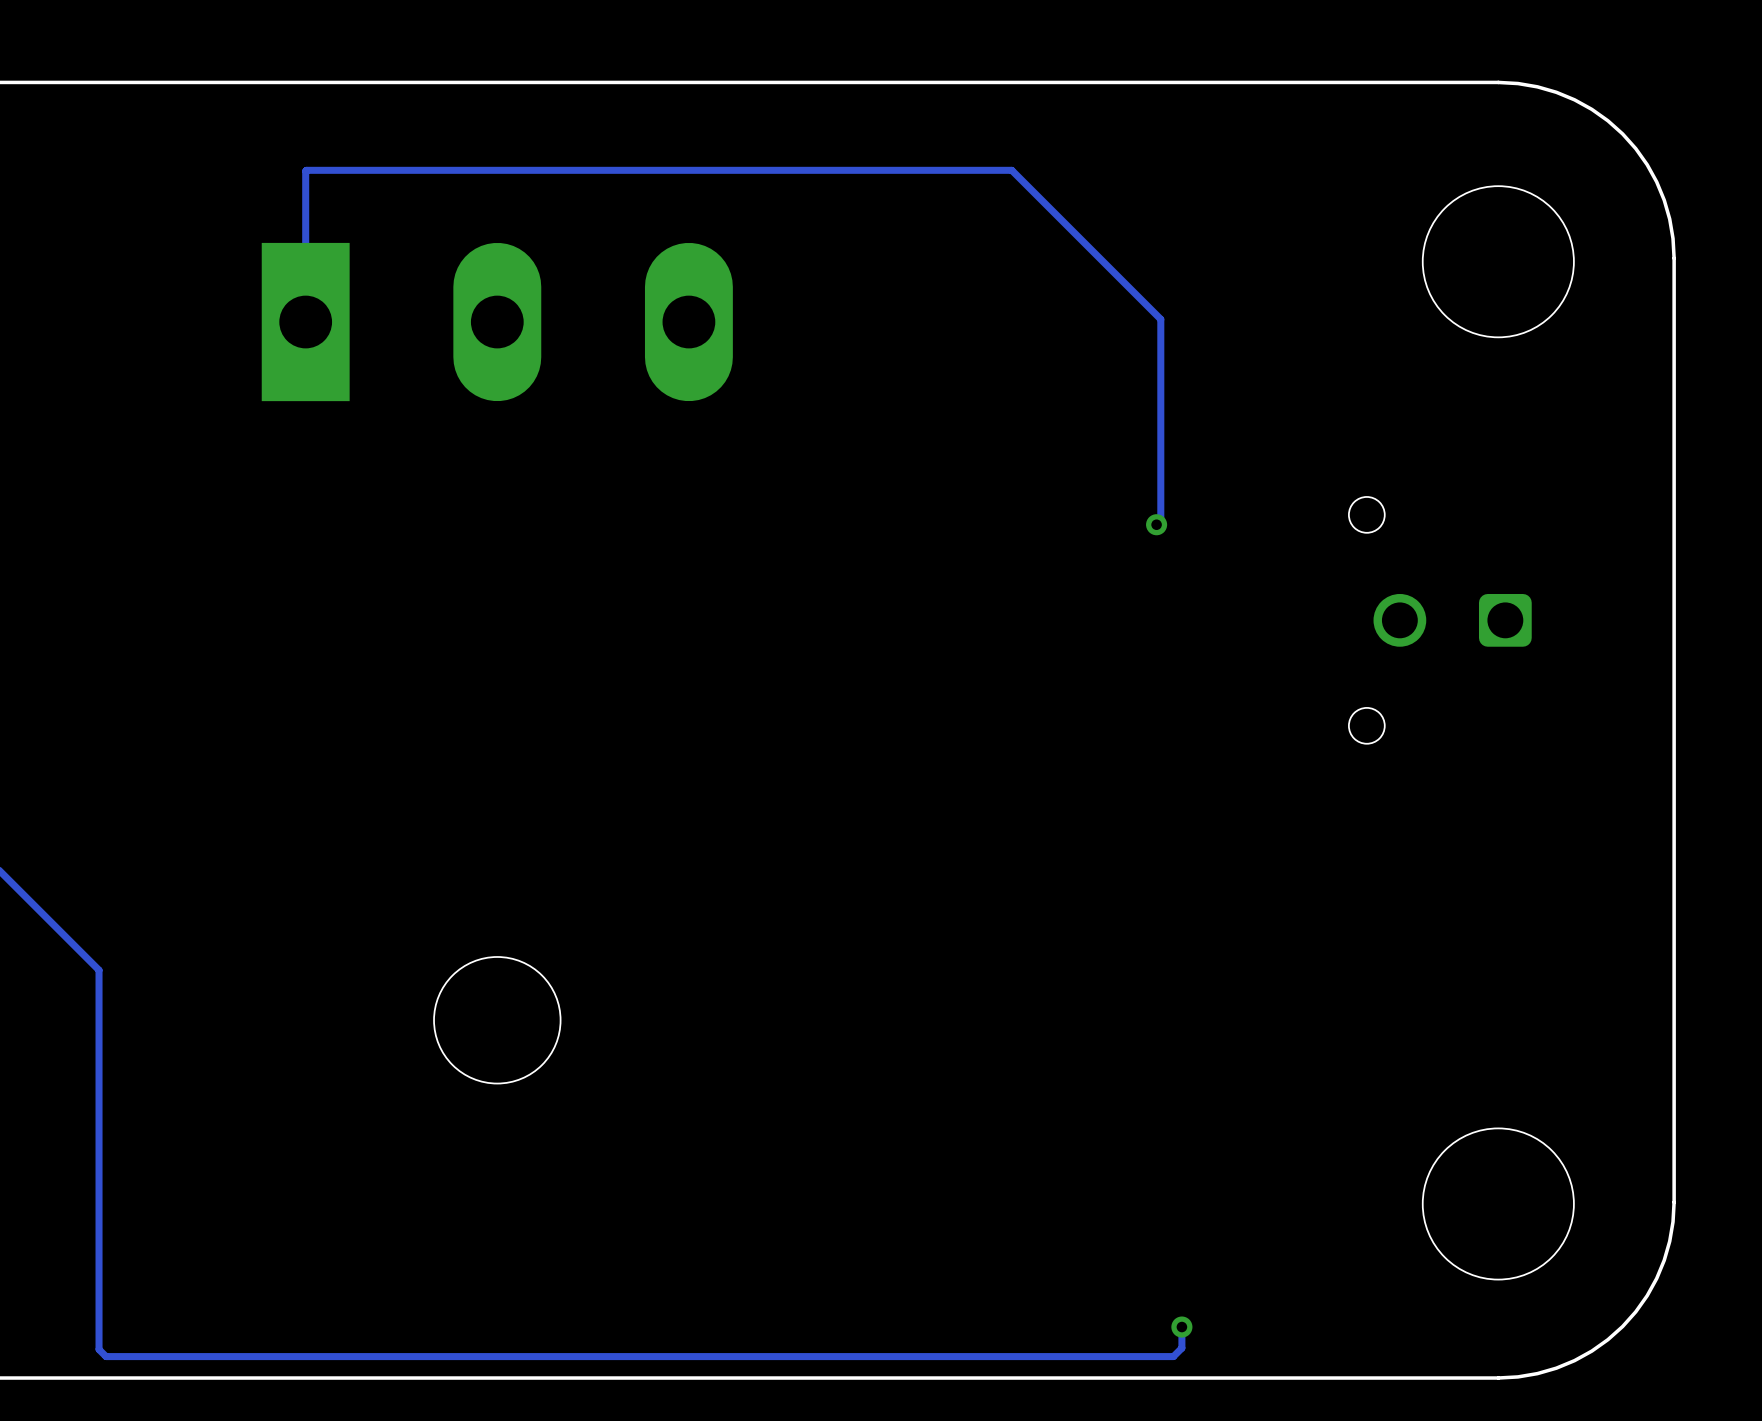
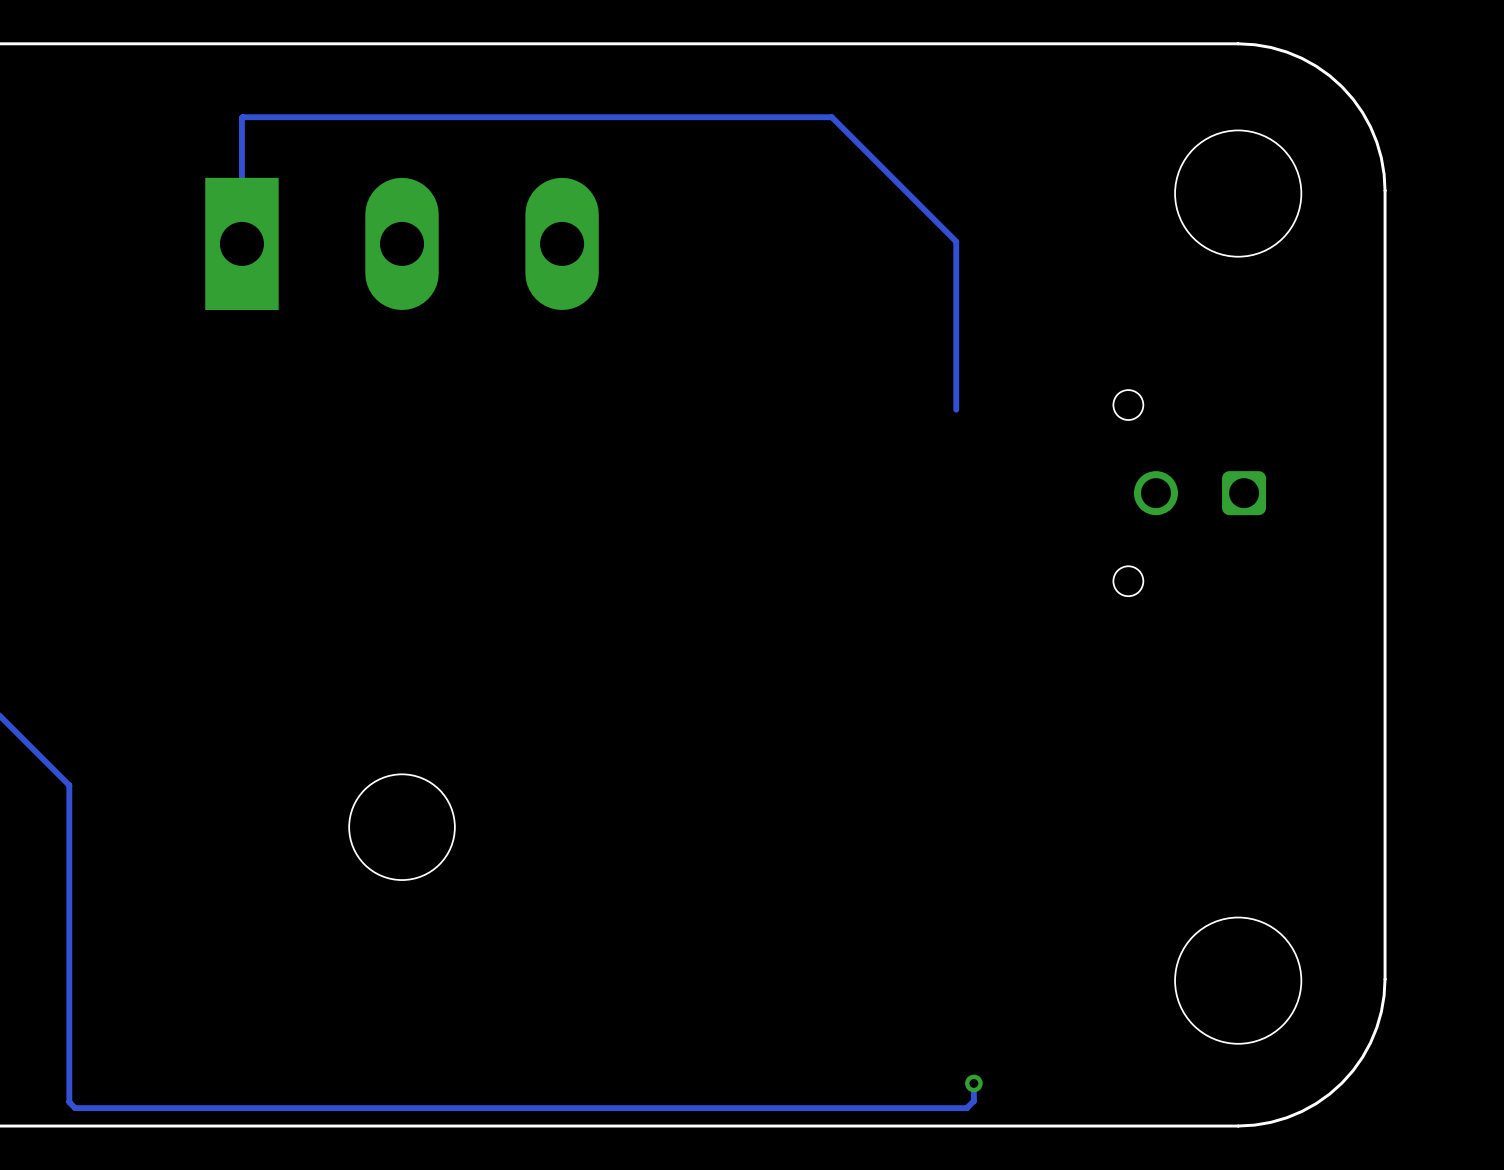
via: (1156, 524) -> none

